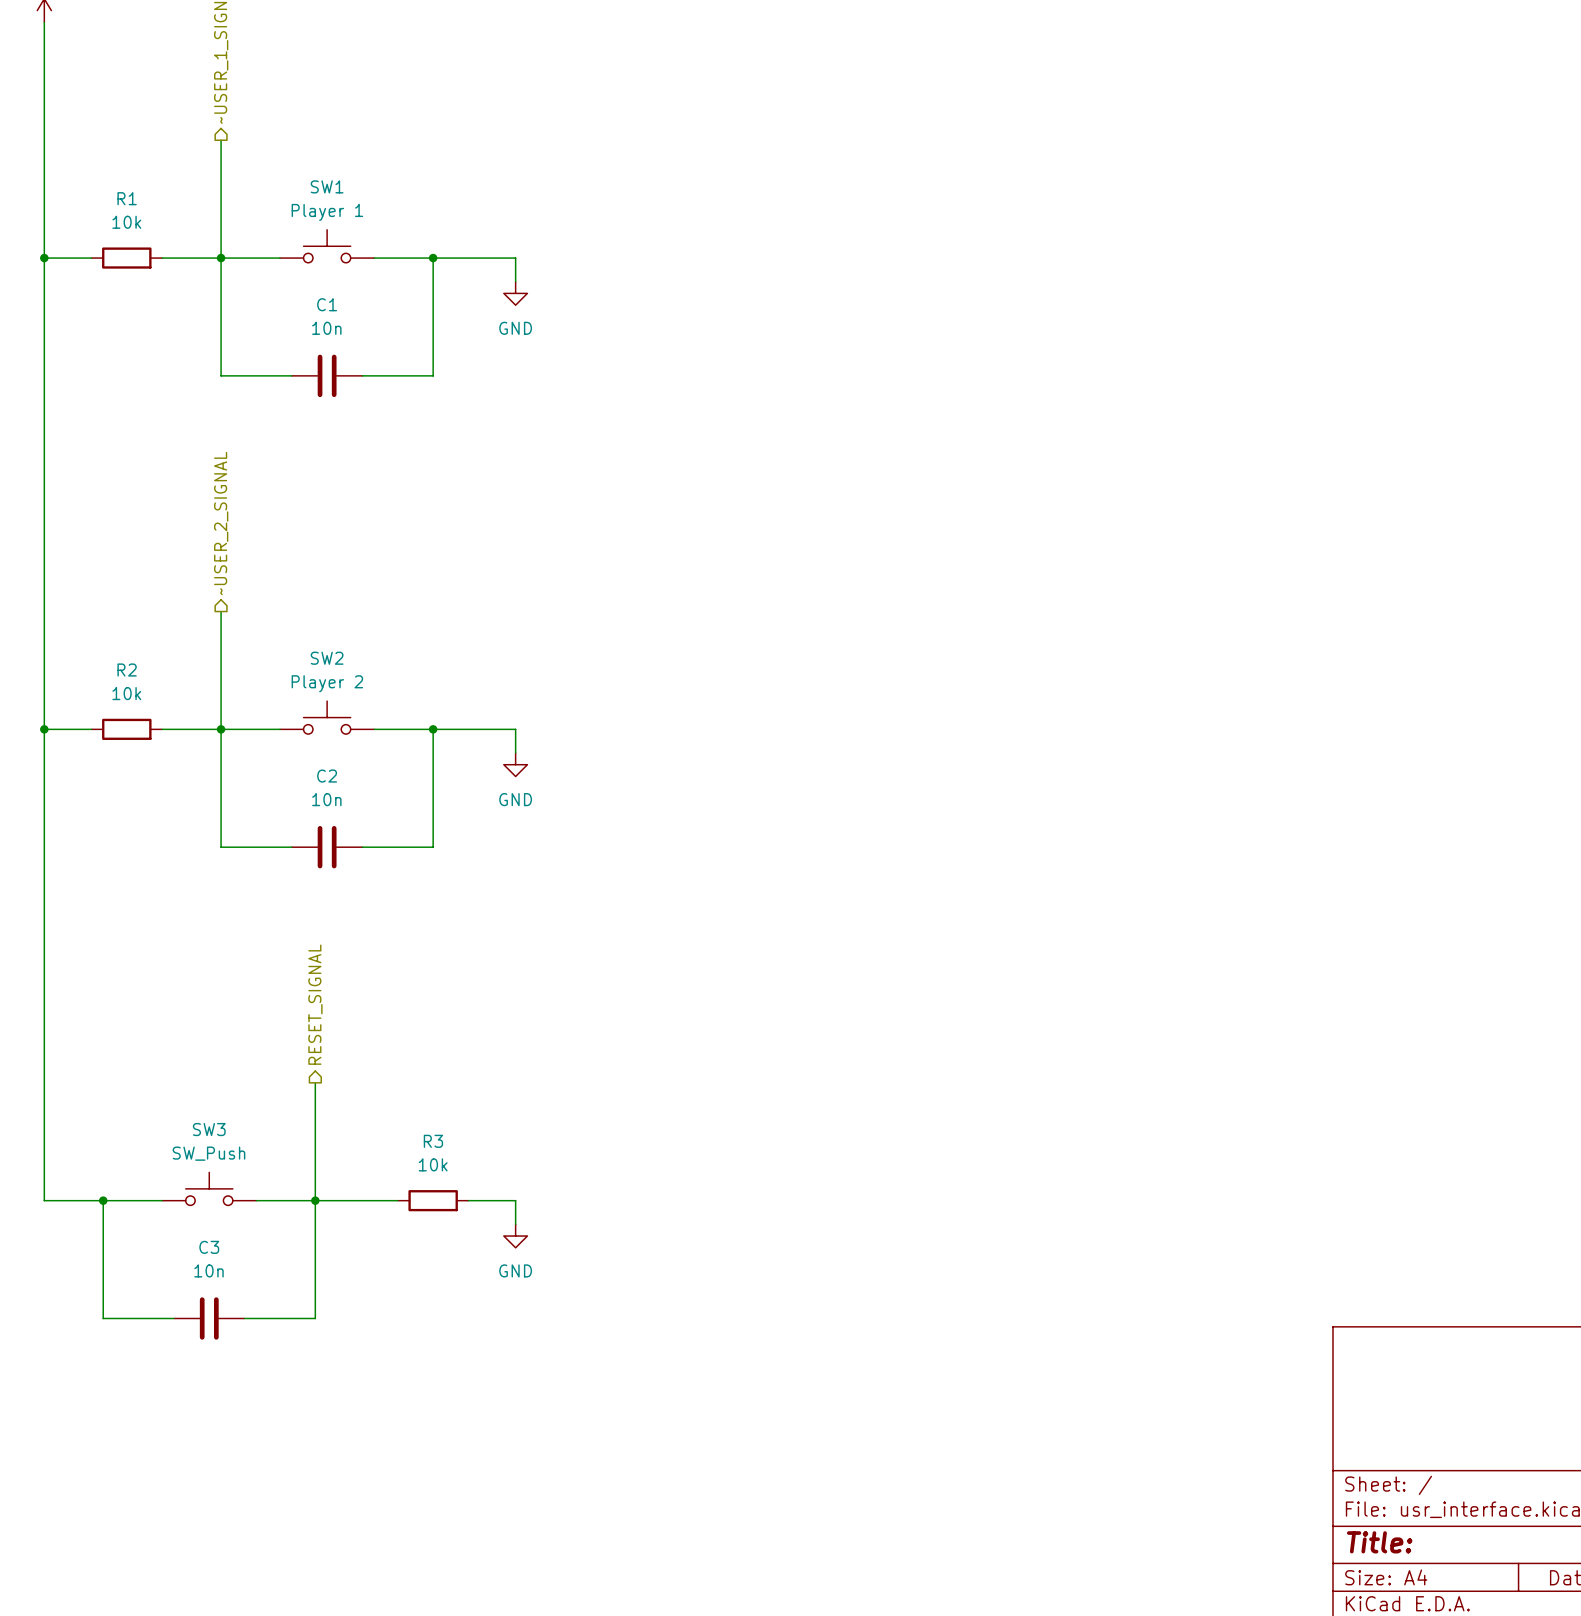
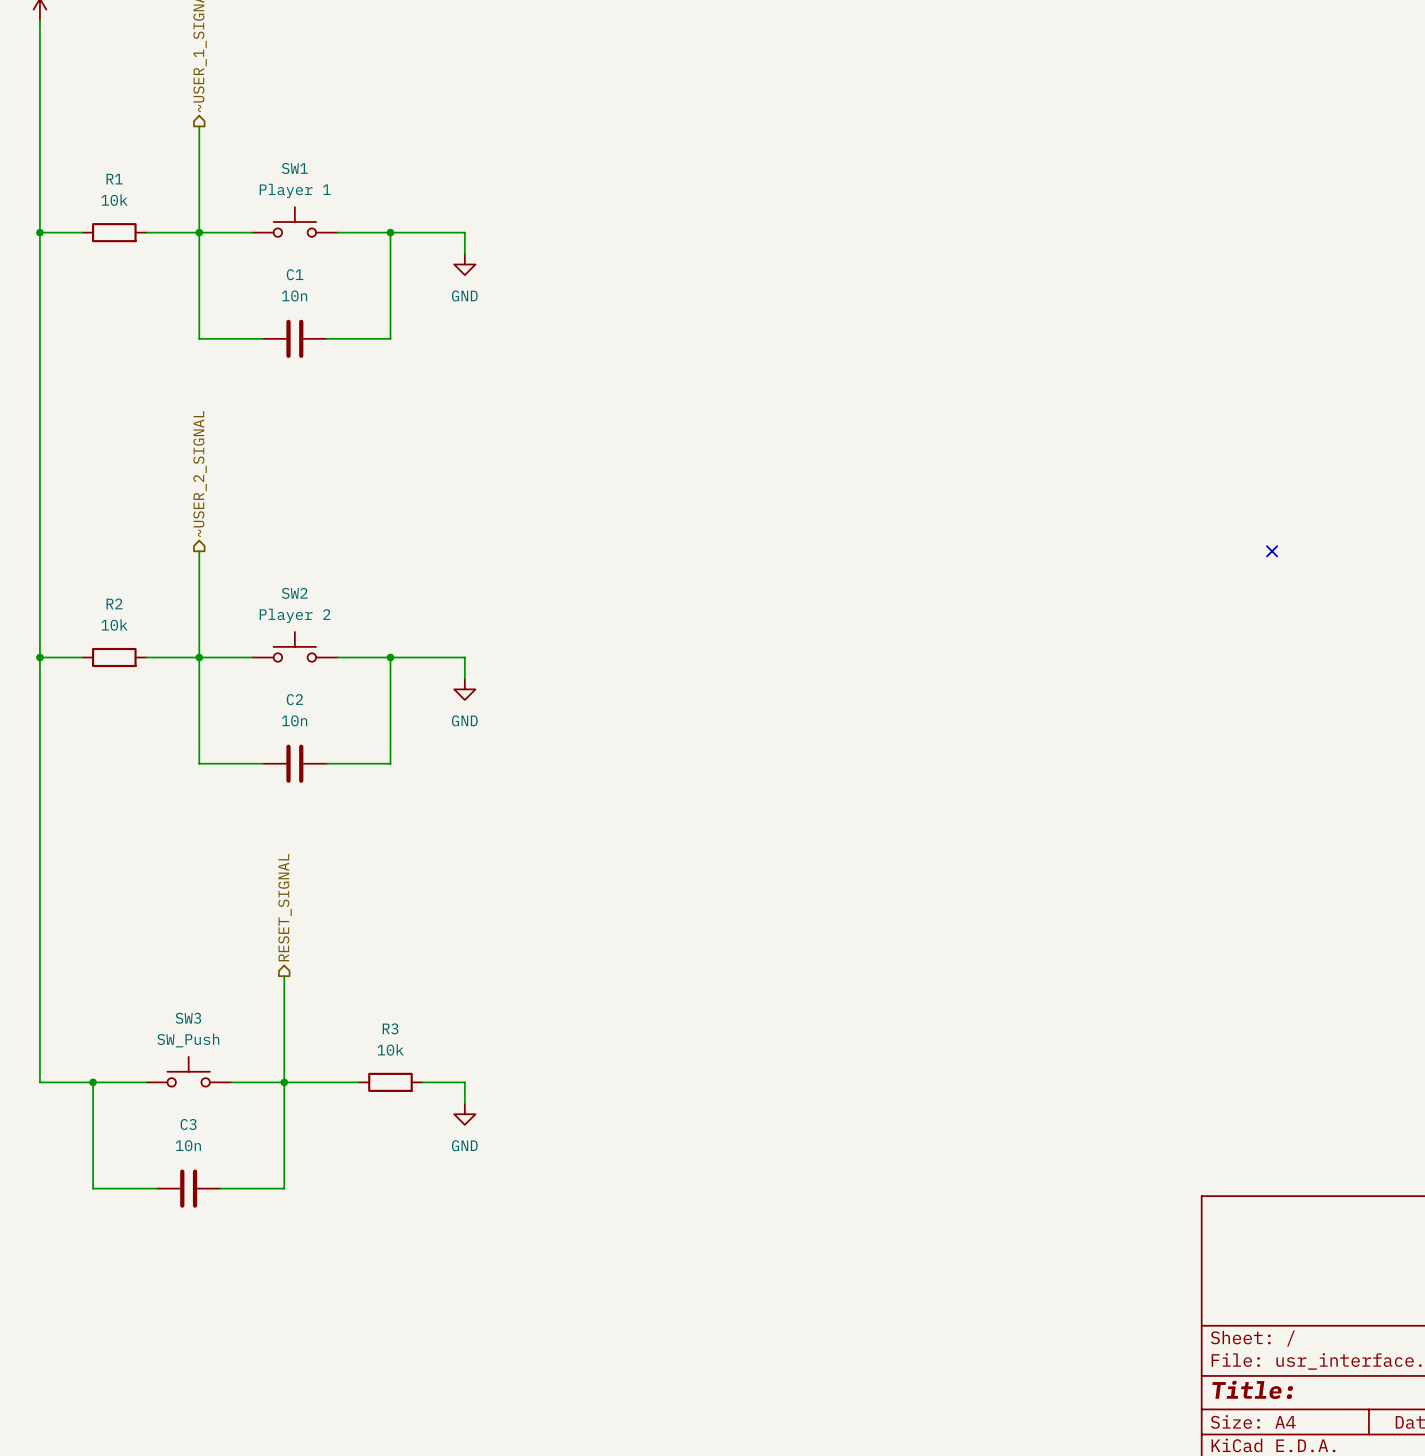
no-connect mark: none -> (1272, 551)

